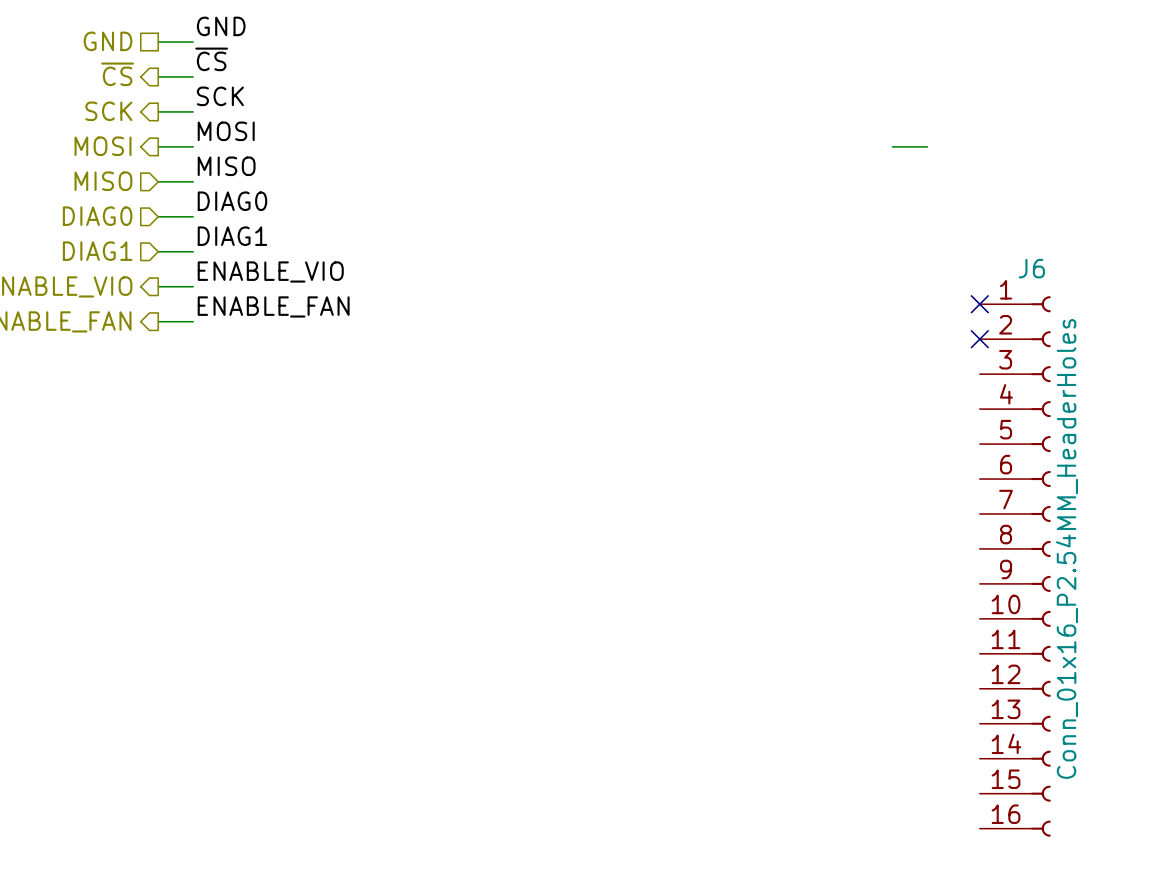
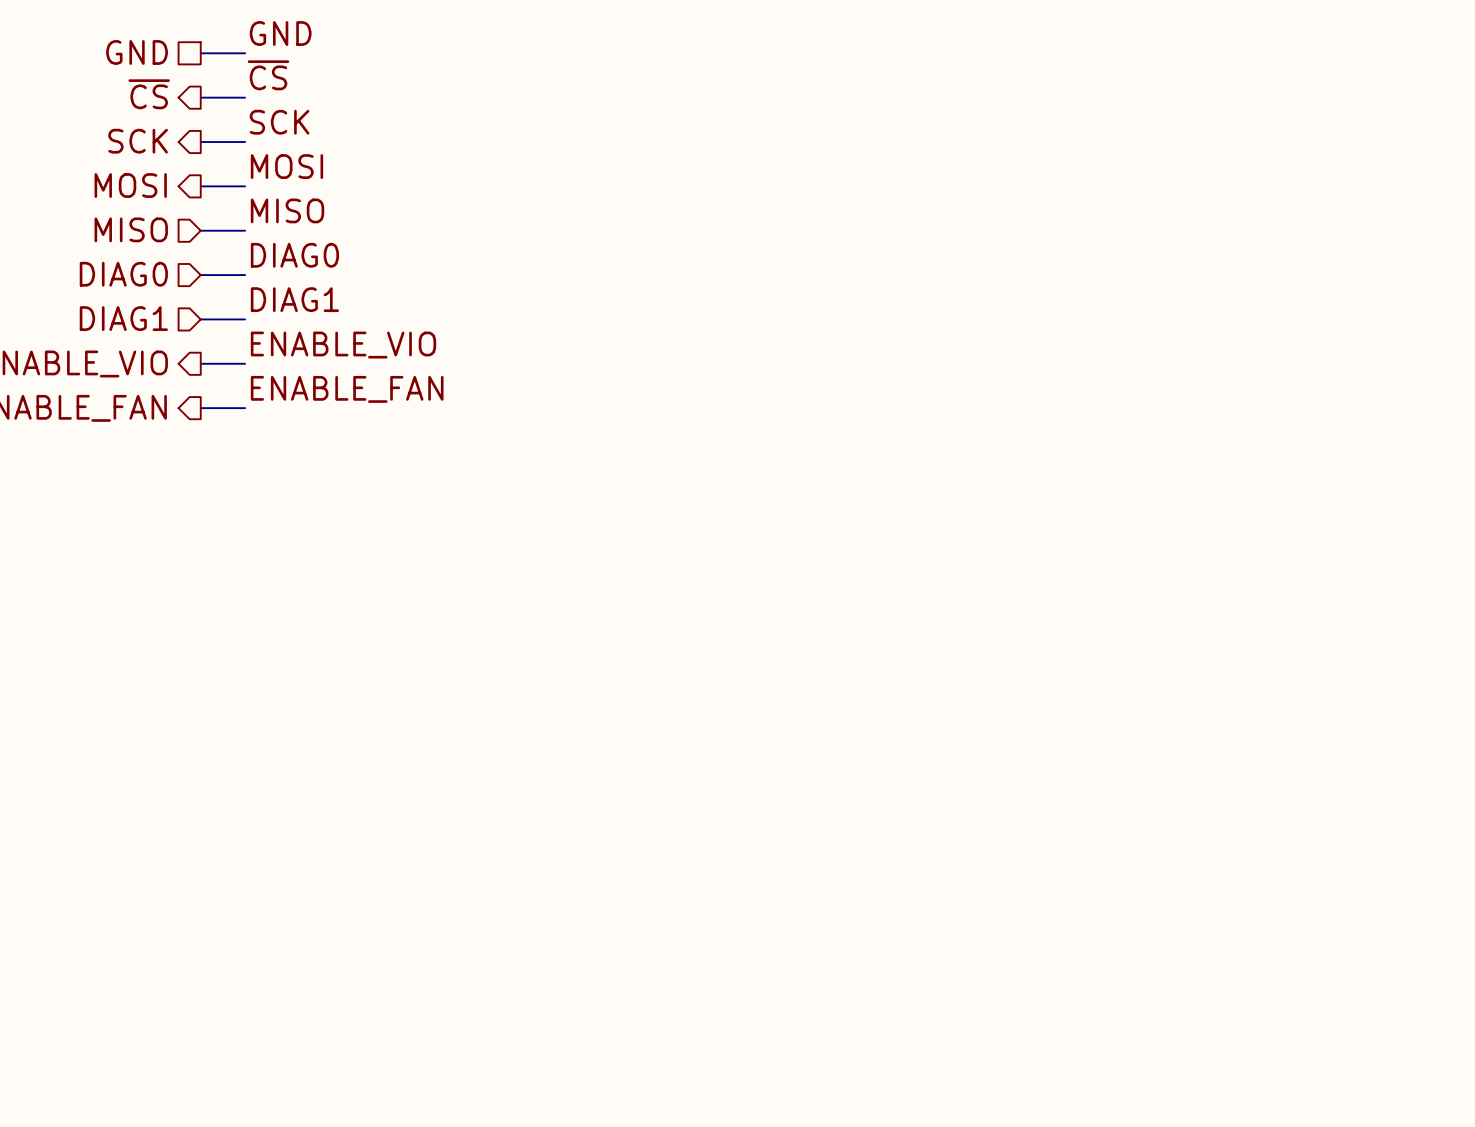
wire: (892, 146) (927, 146) -> none
no-connect mark: (979, 304) -> none
no-connect mark: (979, 339) -> none
J6: Conn_01x16_P2.54MM_HeaderHoles (1015, 566) -> none

